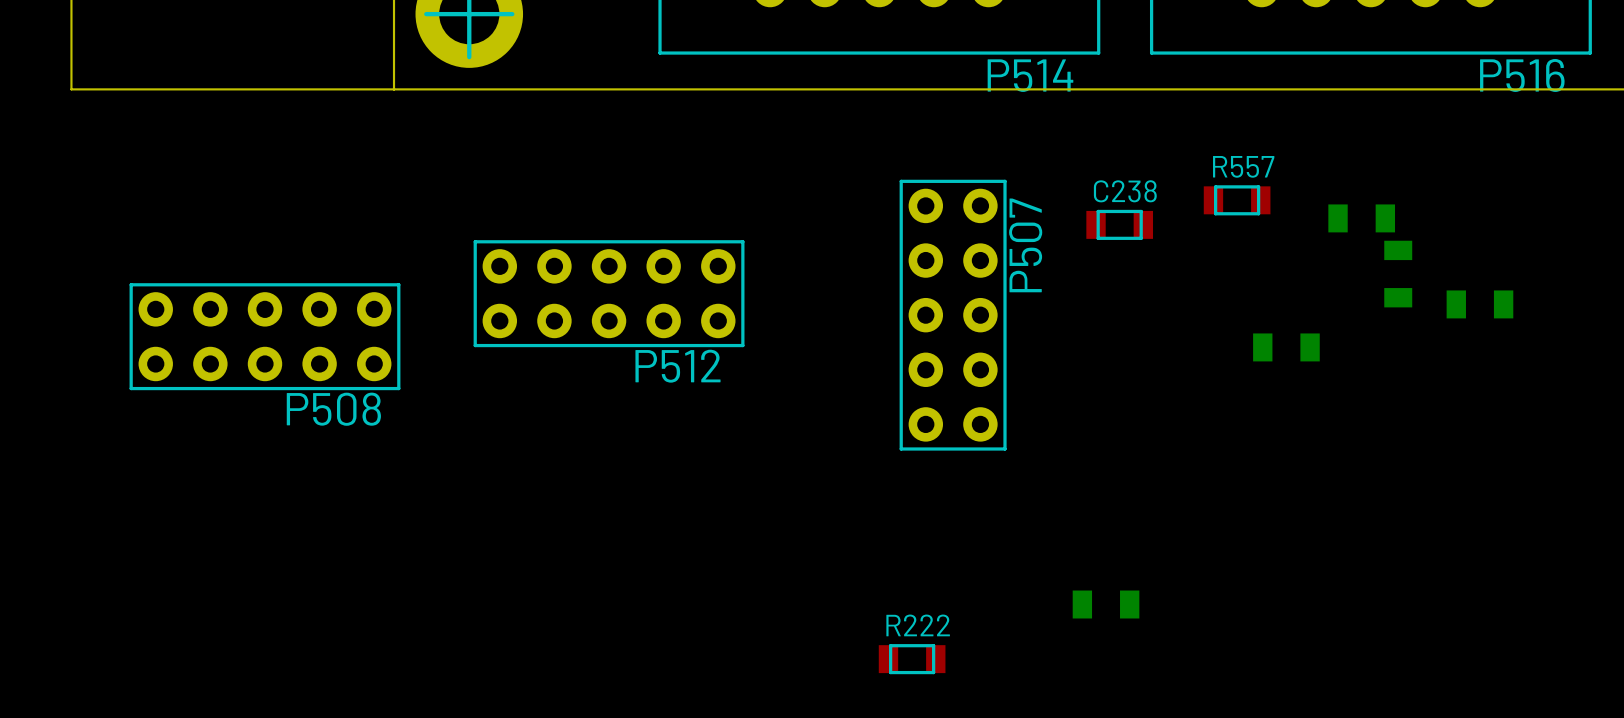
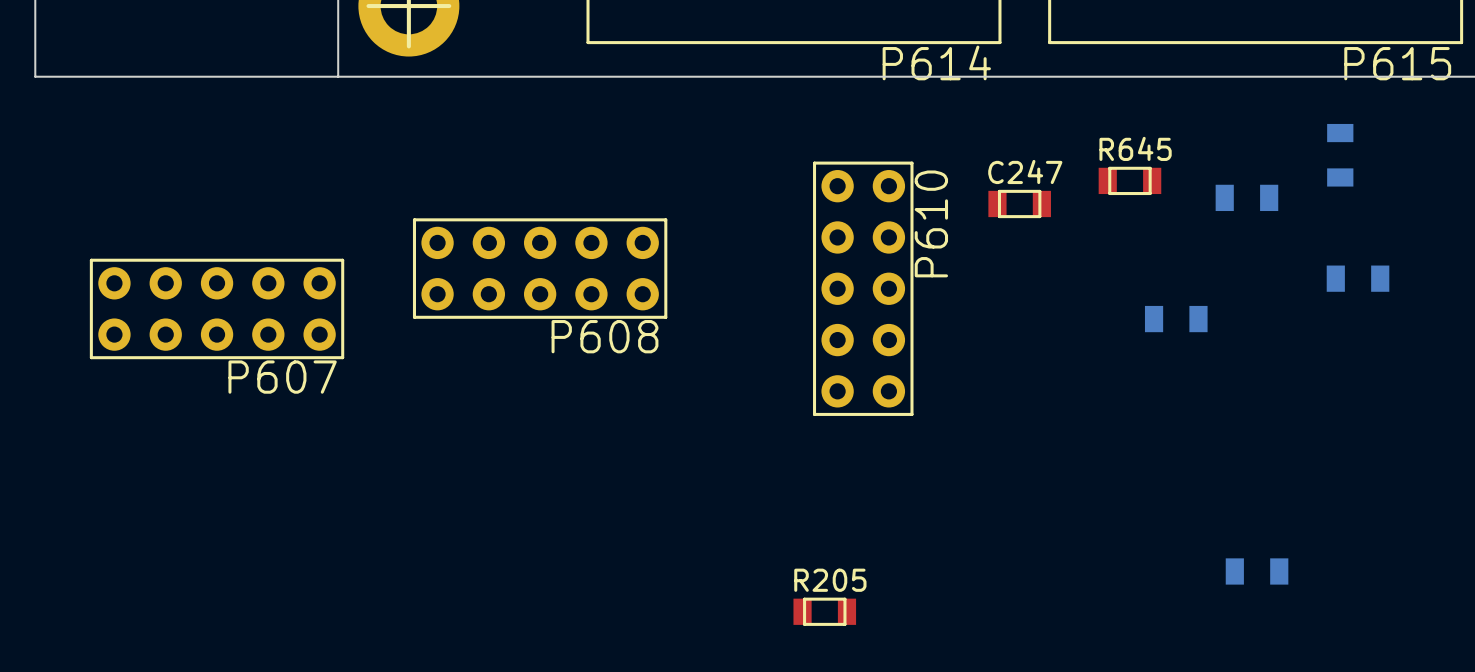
P514 name: P514 (1030, 75) -> P614 (936, 62)
P516 name: P516 (1522, 75) -> P615 (1397, 63)
R557 name: R557 (1243, 166) -> R645 (1135, 148)
C238 name: C238 (1125, 191) -> C247 (1025, 171)
P507 name: P507 (1025, 245) -> P610 (931, 223)
part position: (1398, 274) -> (1340, 155)
P512 name: P512 (677, 366) -> P608 (604, 336)
P508 name: P508 (333, 409) -> P607 (282, 377)
part: (1106, 604) -> none
part: none -> (1257, 571)
R222 name: R222 (918, 625) -> R205 (830, 580)

